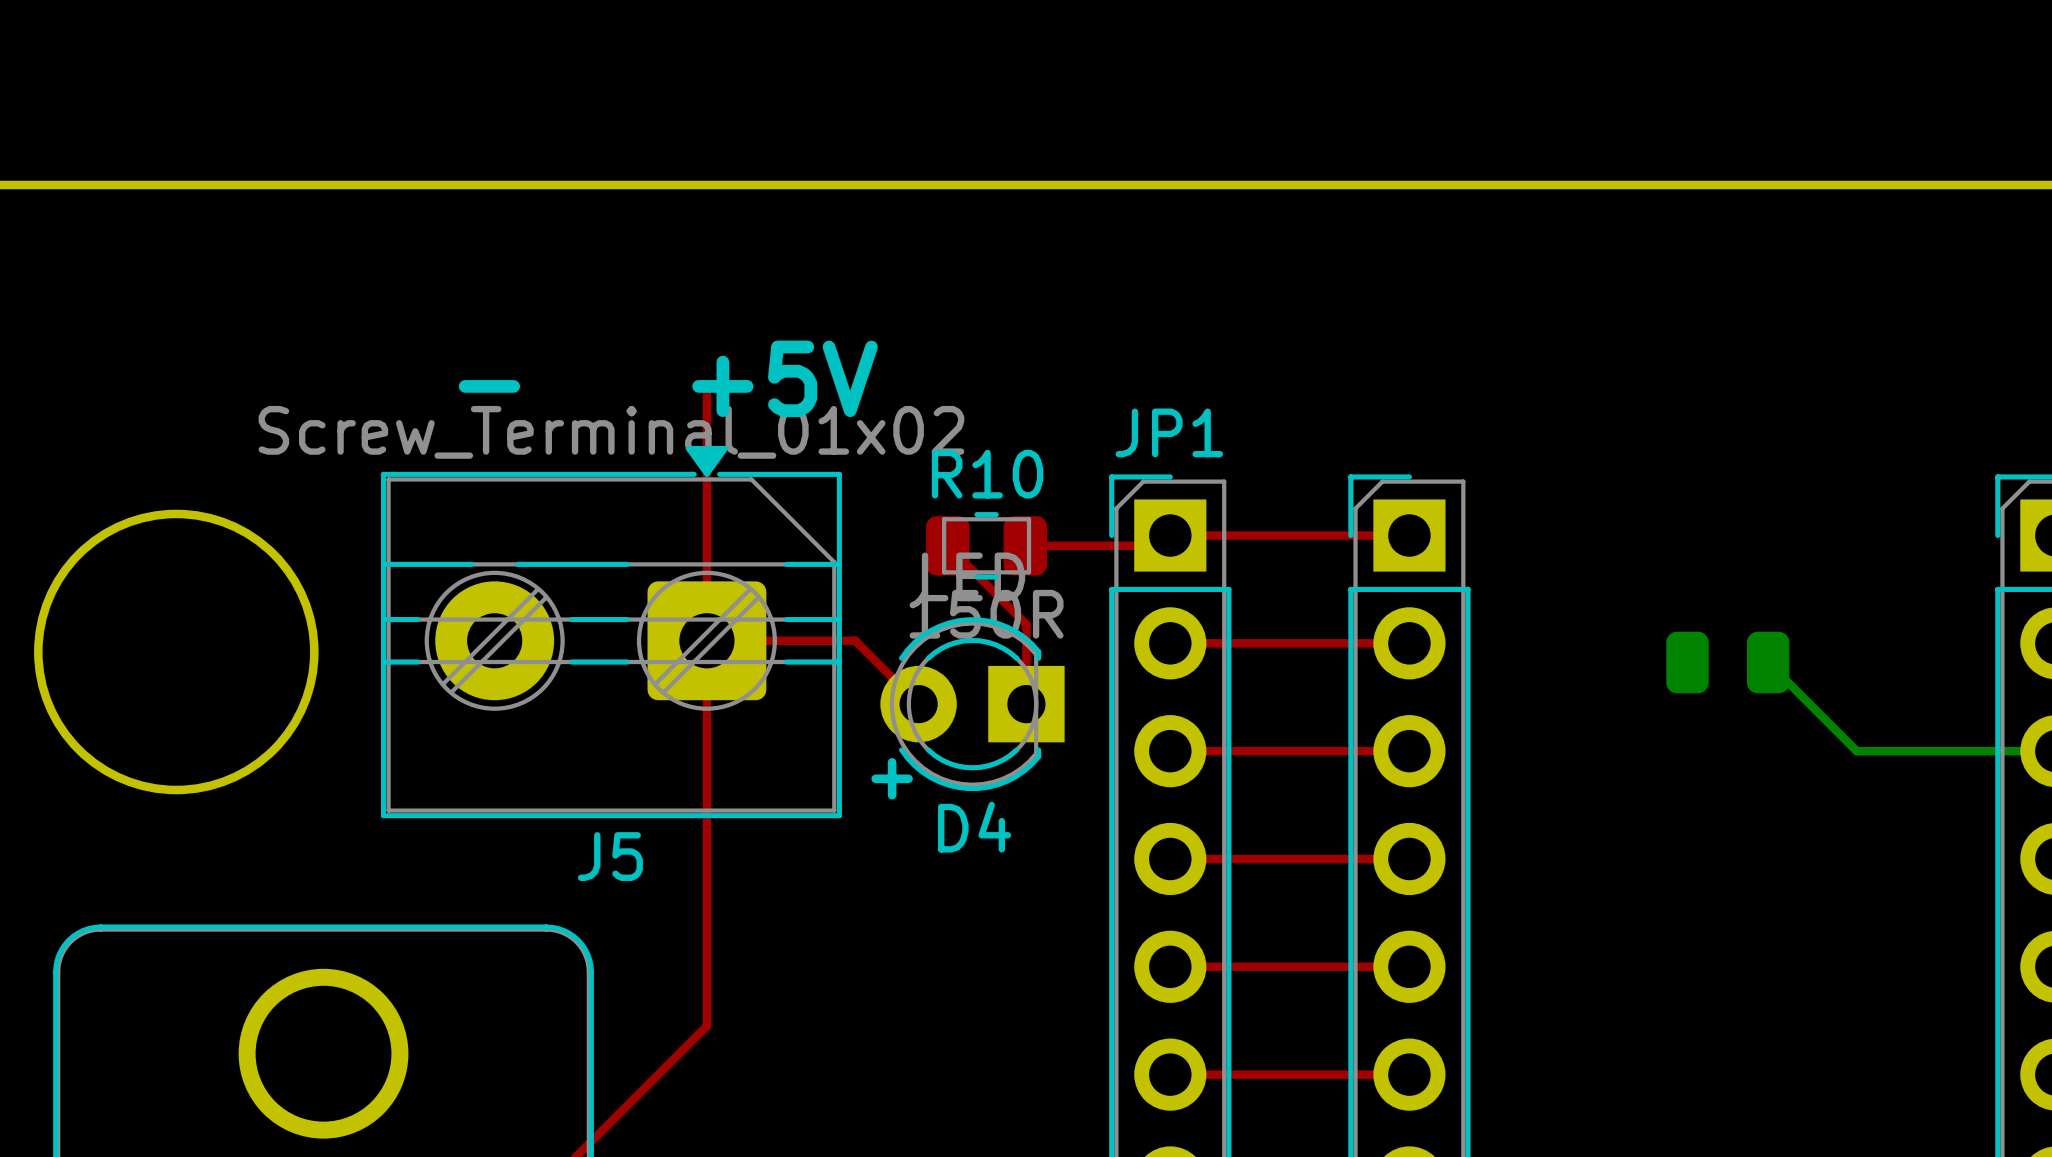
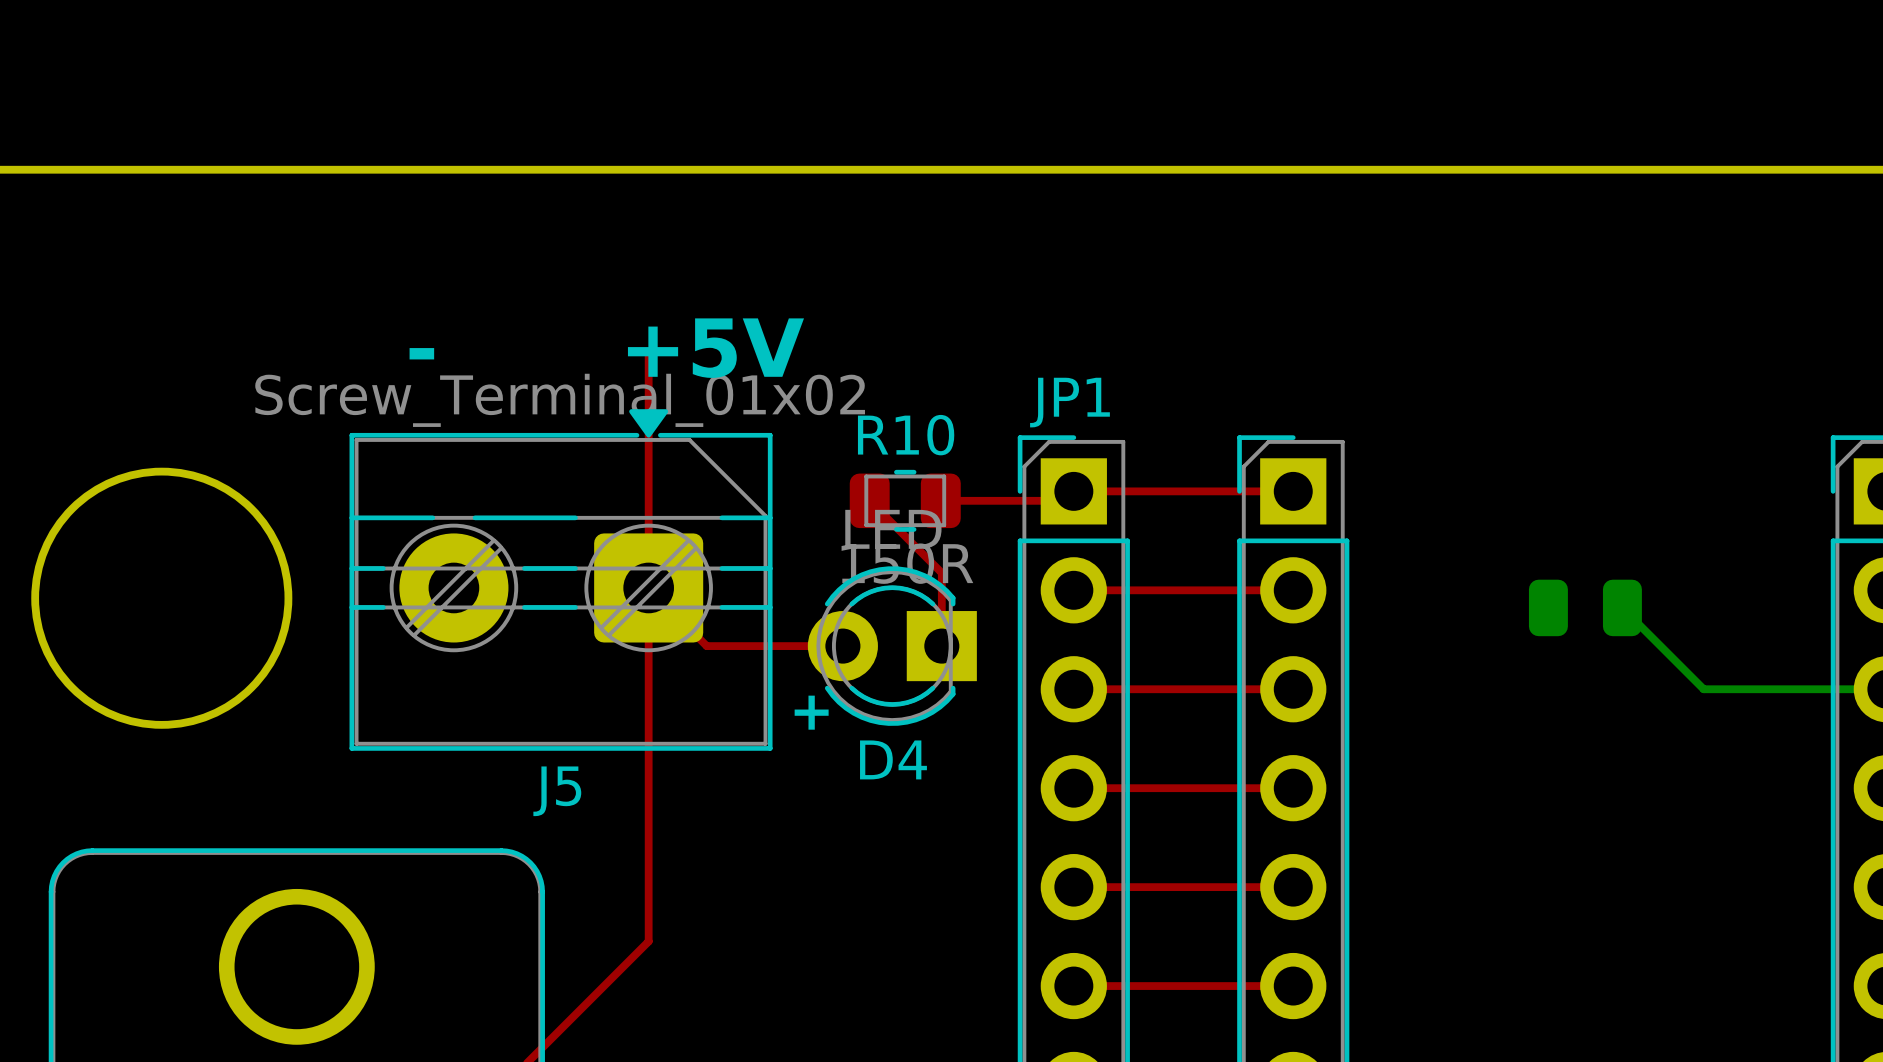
top track: (706, 640) (855, 640) (918, 704) -> (648, 587) (706, 646) (842, 646)

